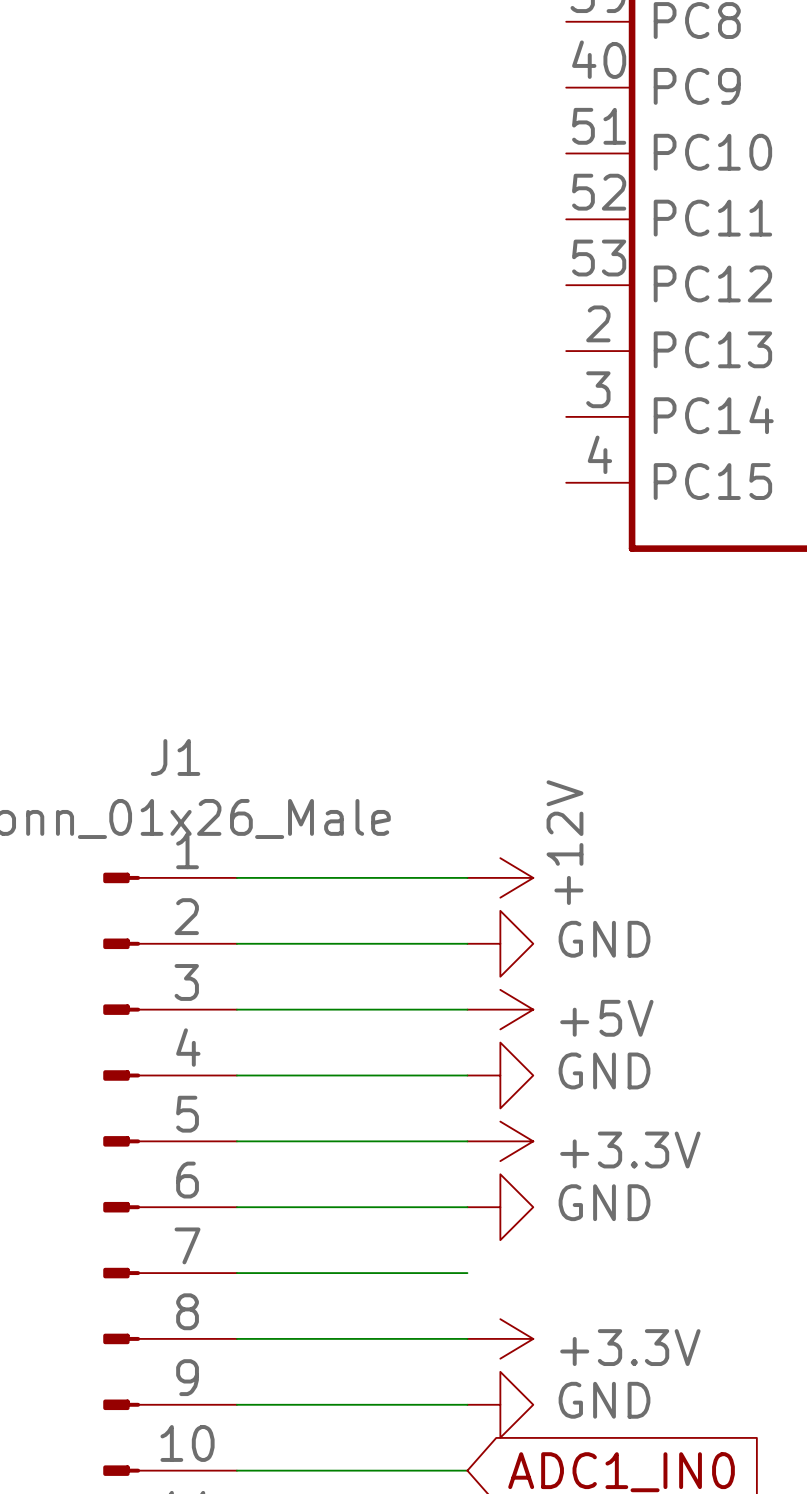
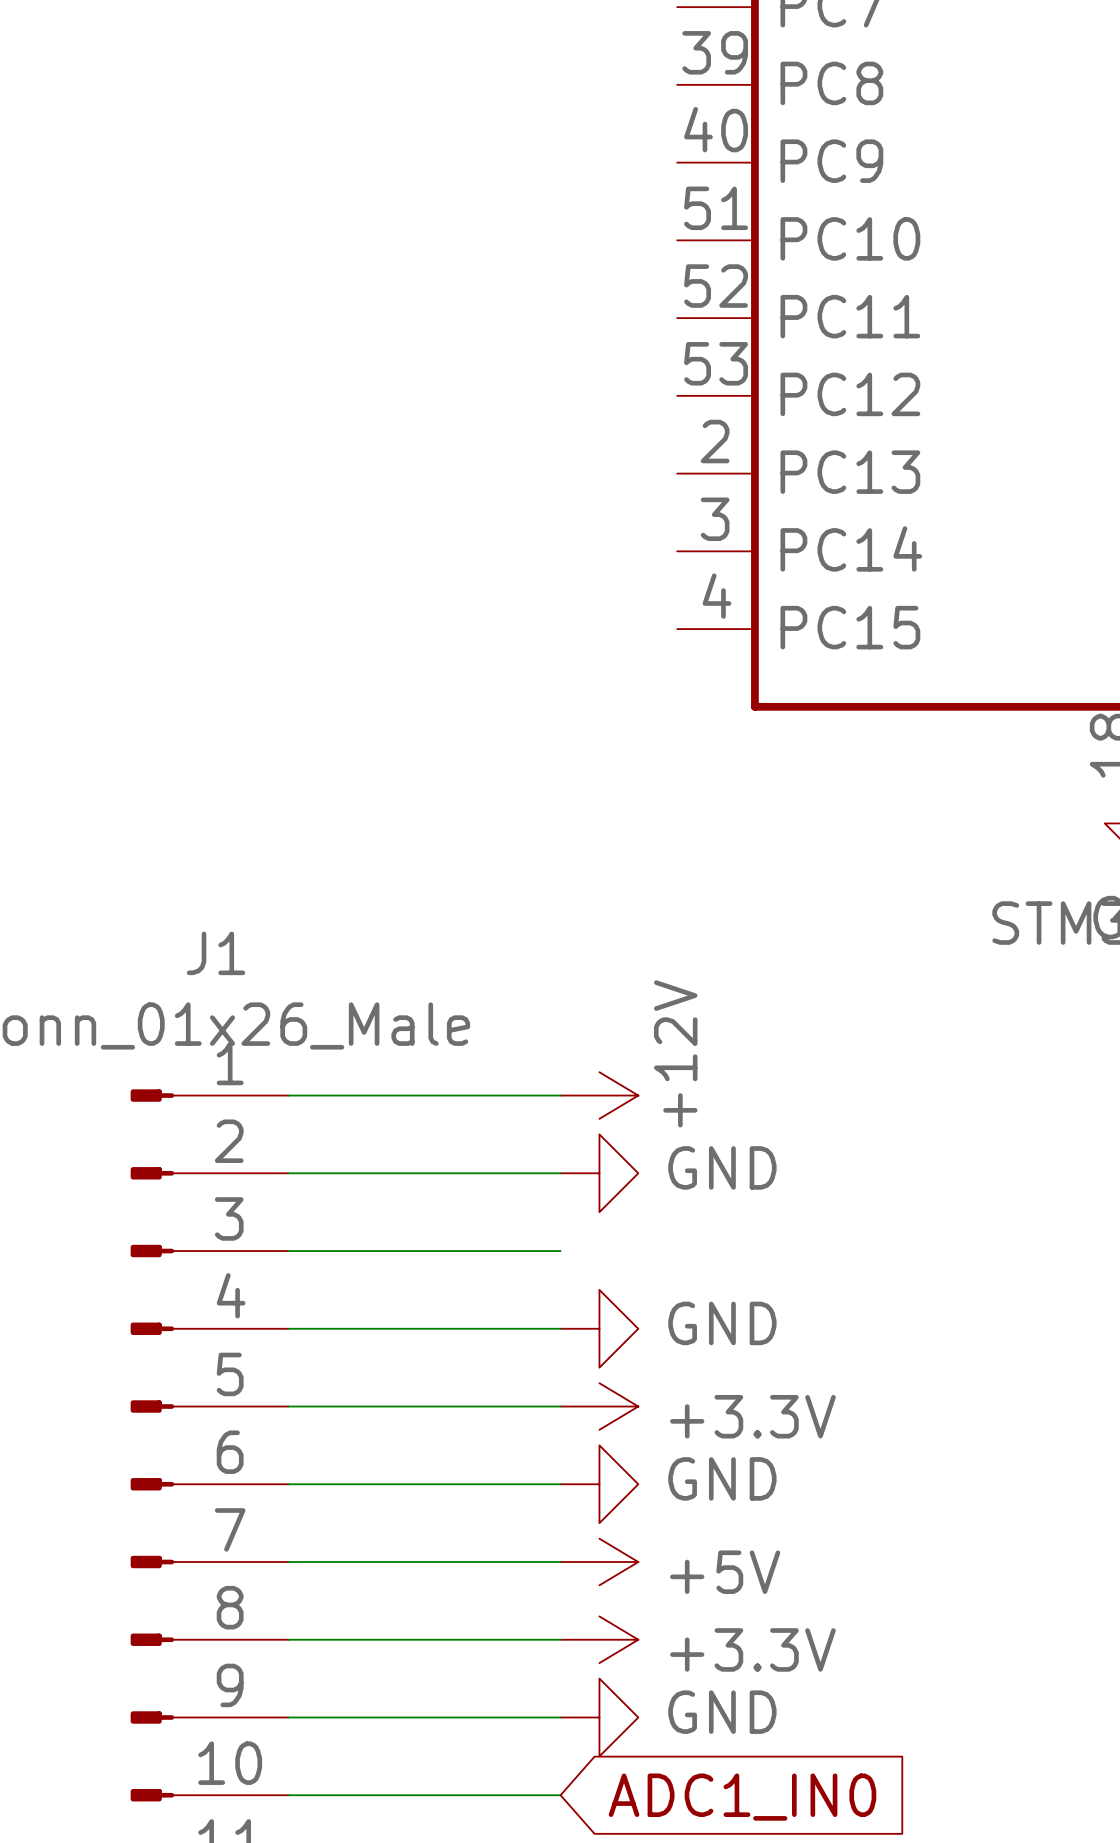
power symbol position: +5V (500, 1009) -> +5V (599, 1562)

